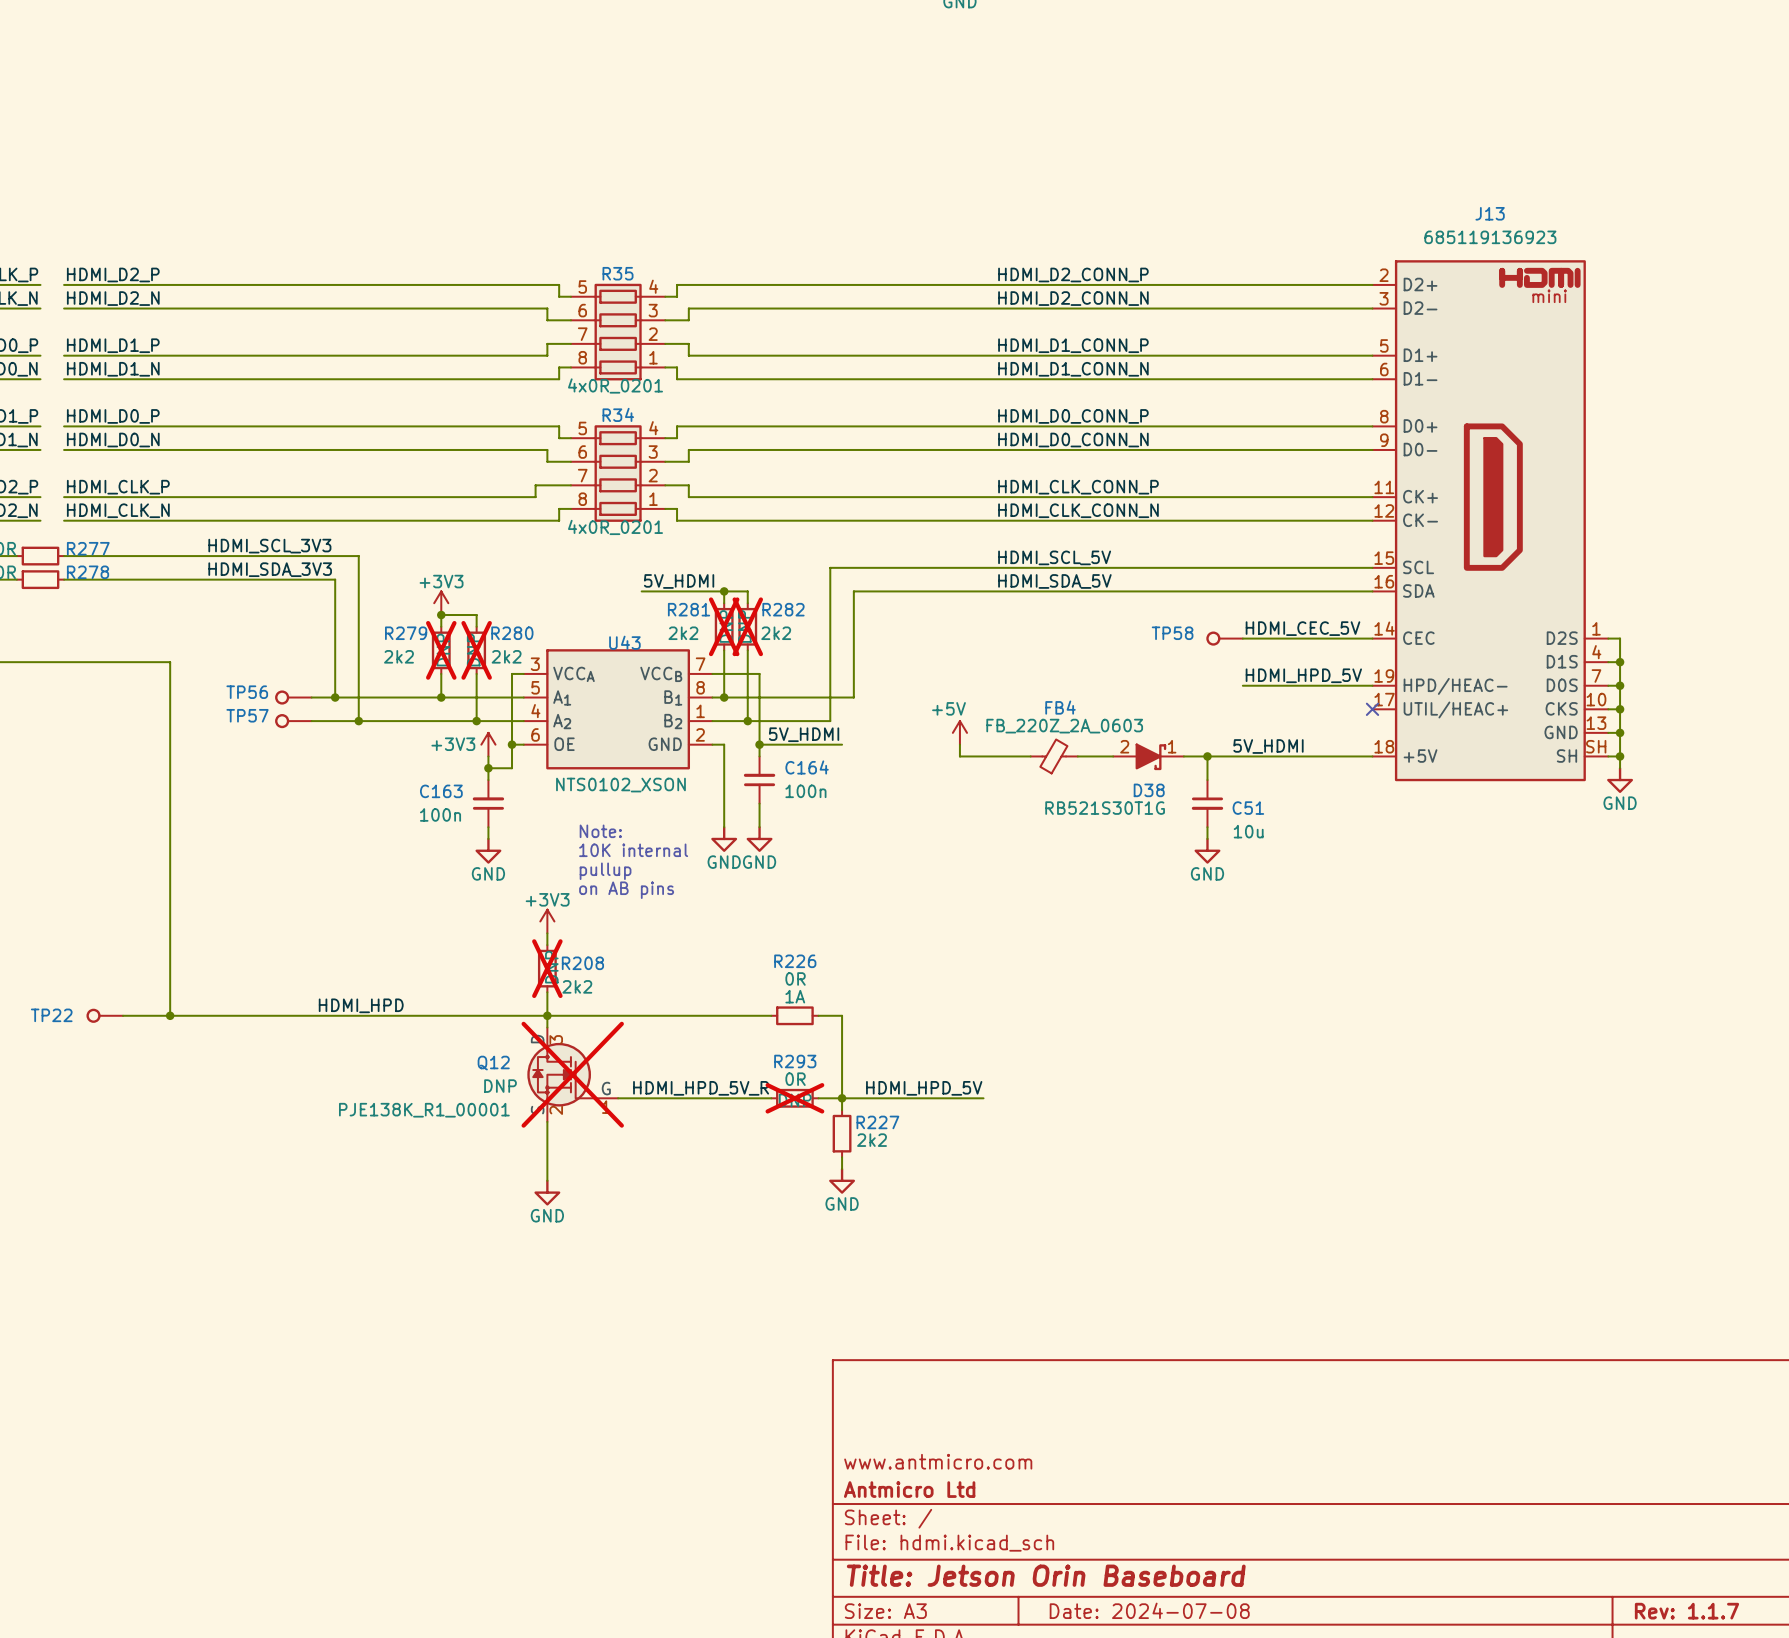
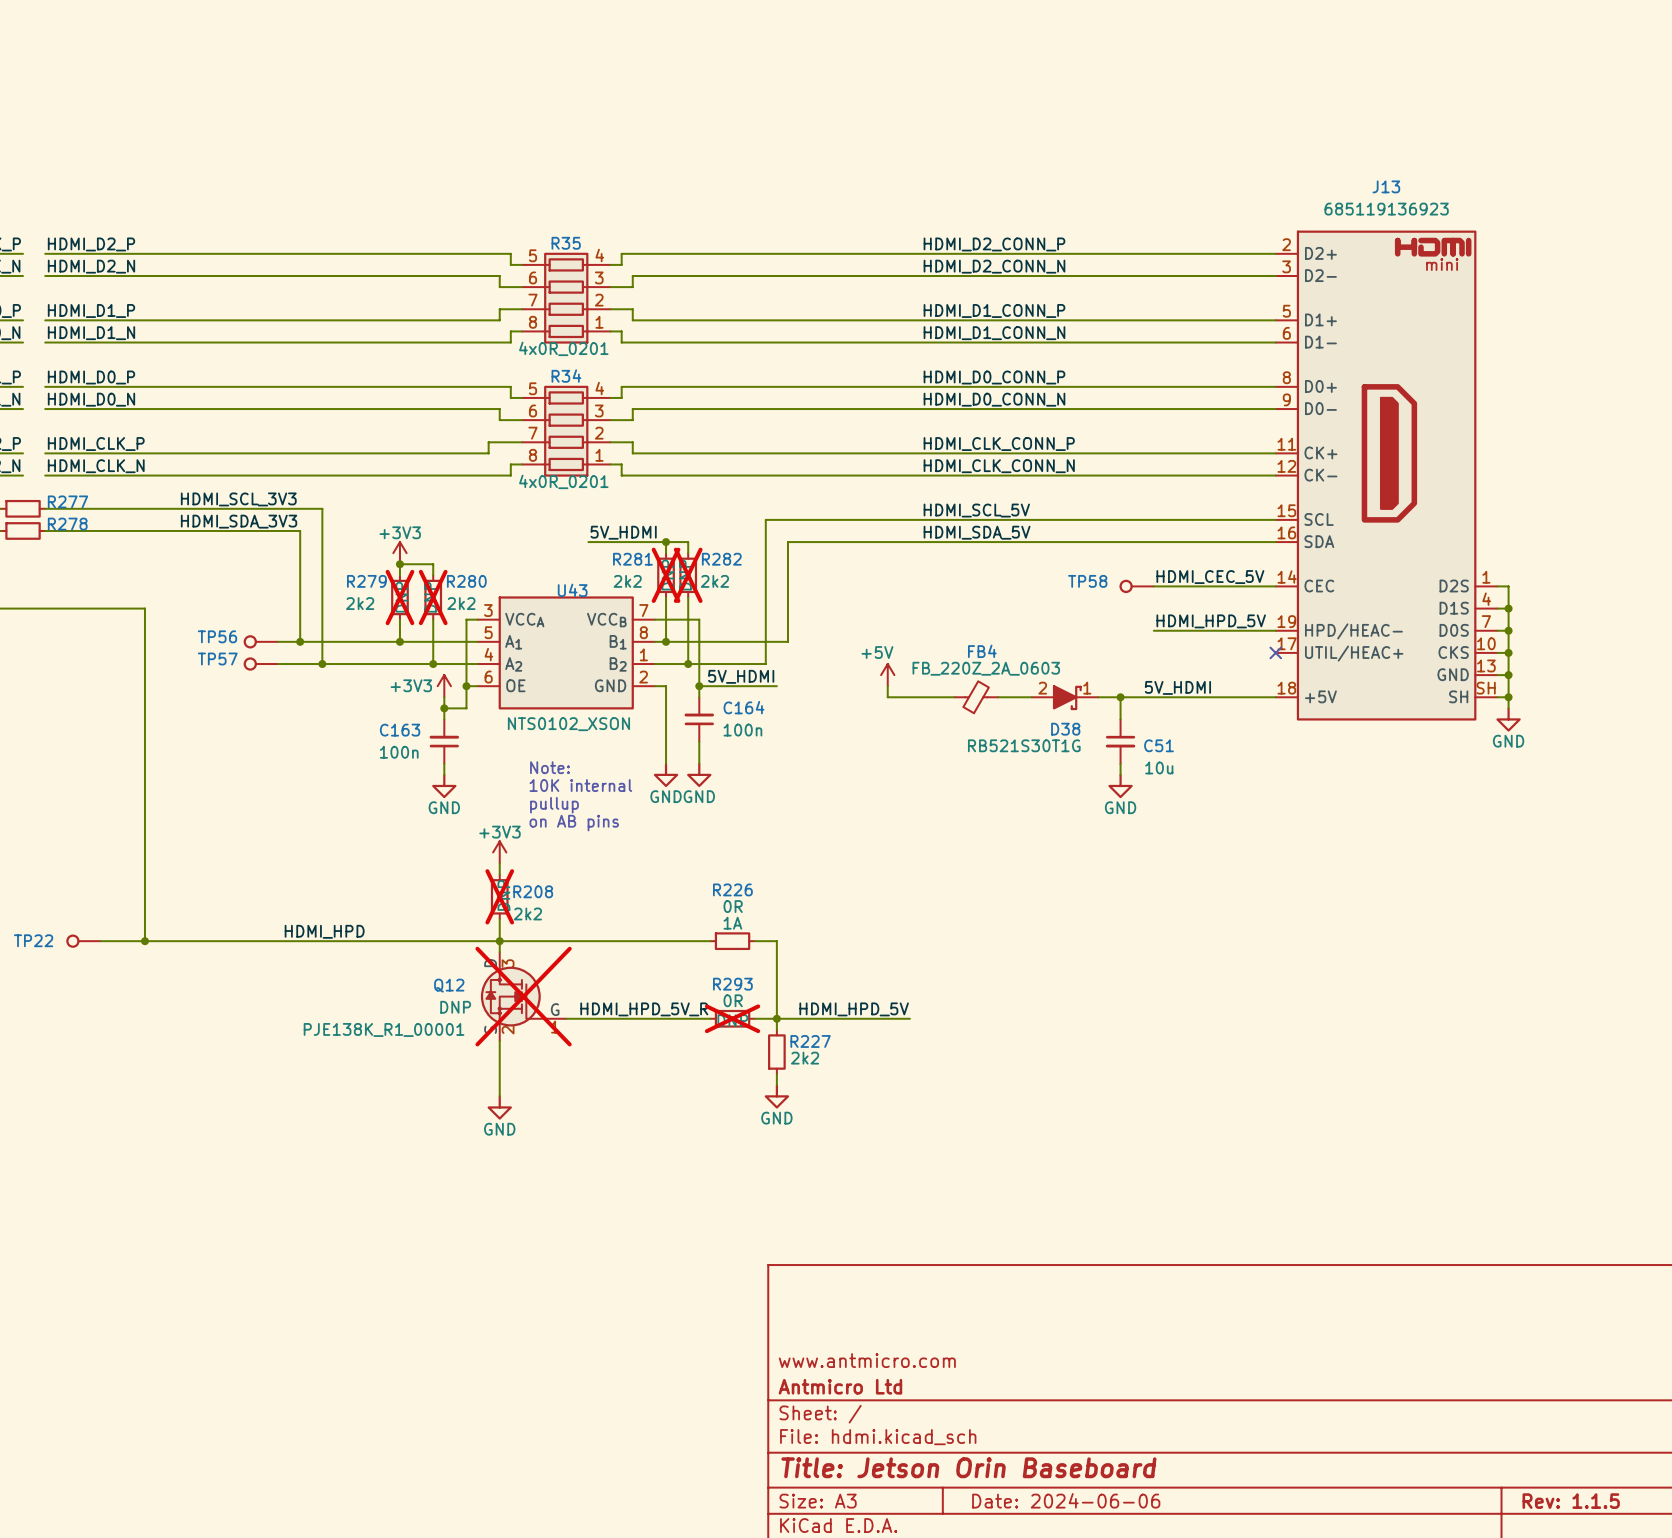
title block: Date: 2024-07-08 (1149, 1610) -> Date: 2024-06-06 (1066, 1500)
title block: Rev: 1.1.7 (1686, 1611) -> Rev: 1.1.5 (1571, 1501)

